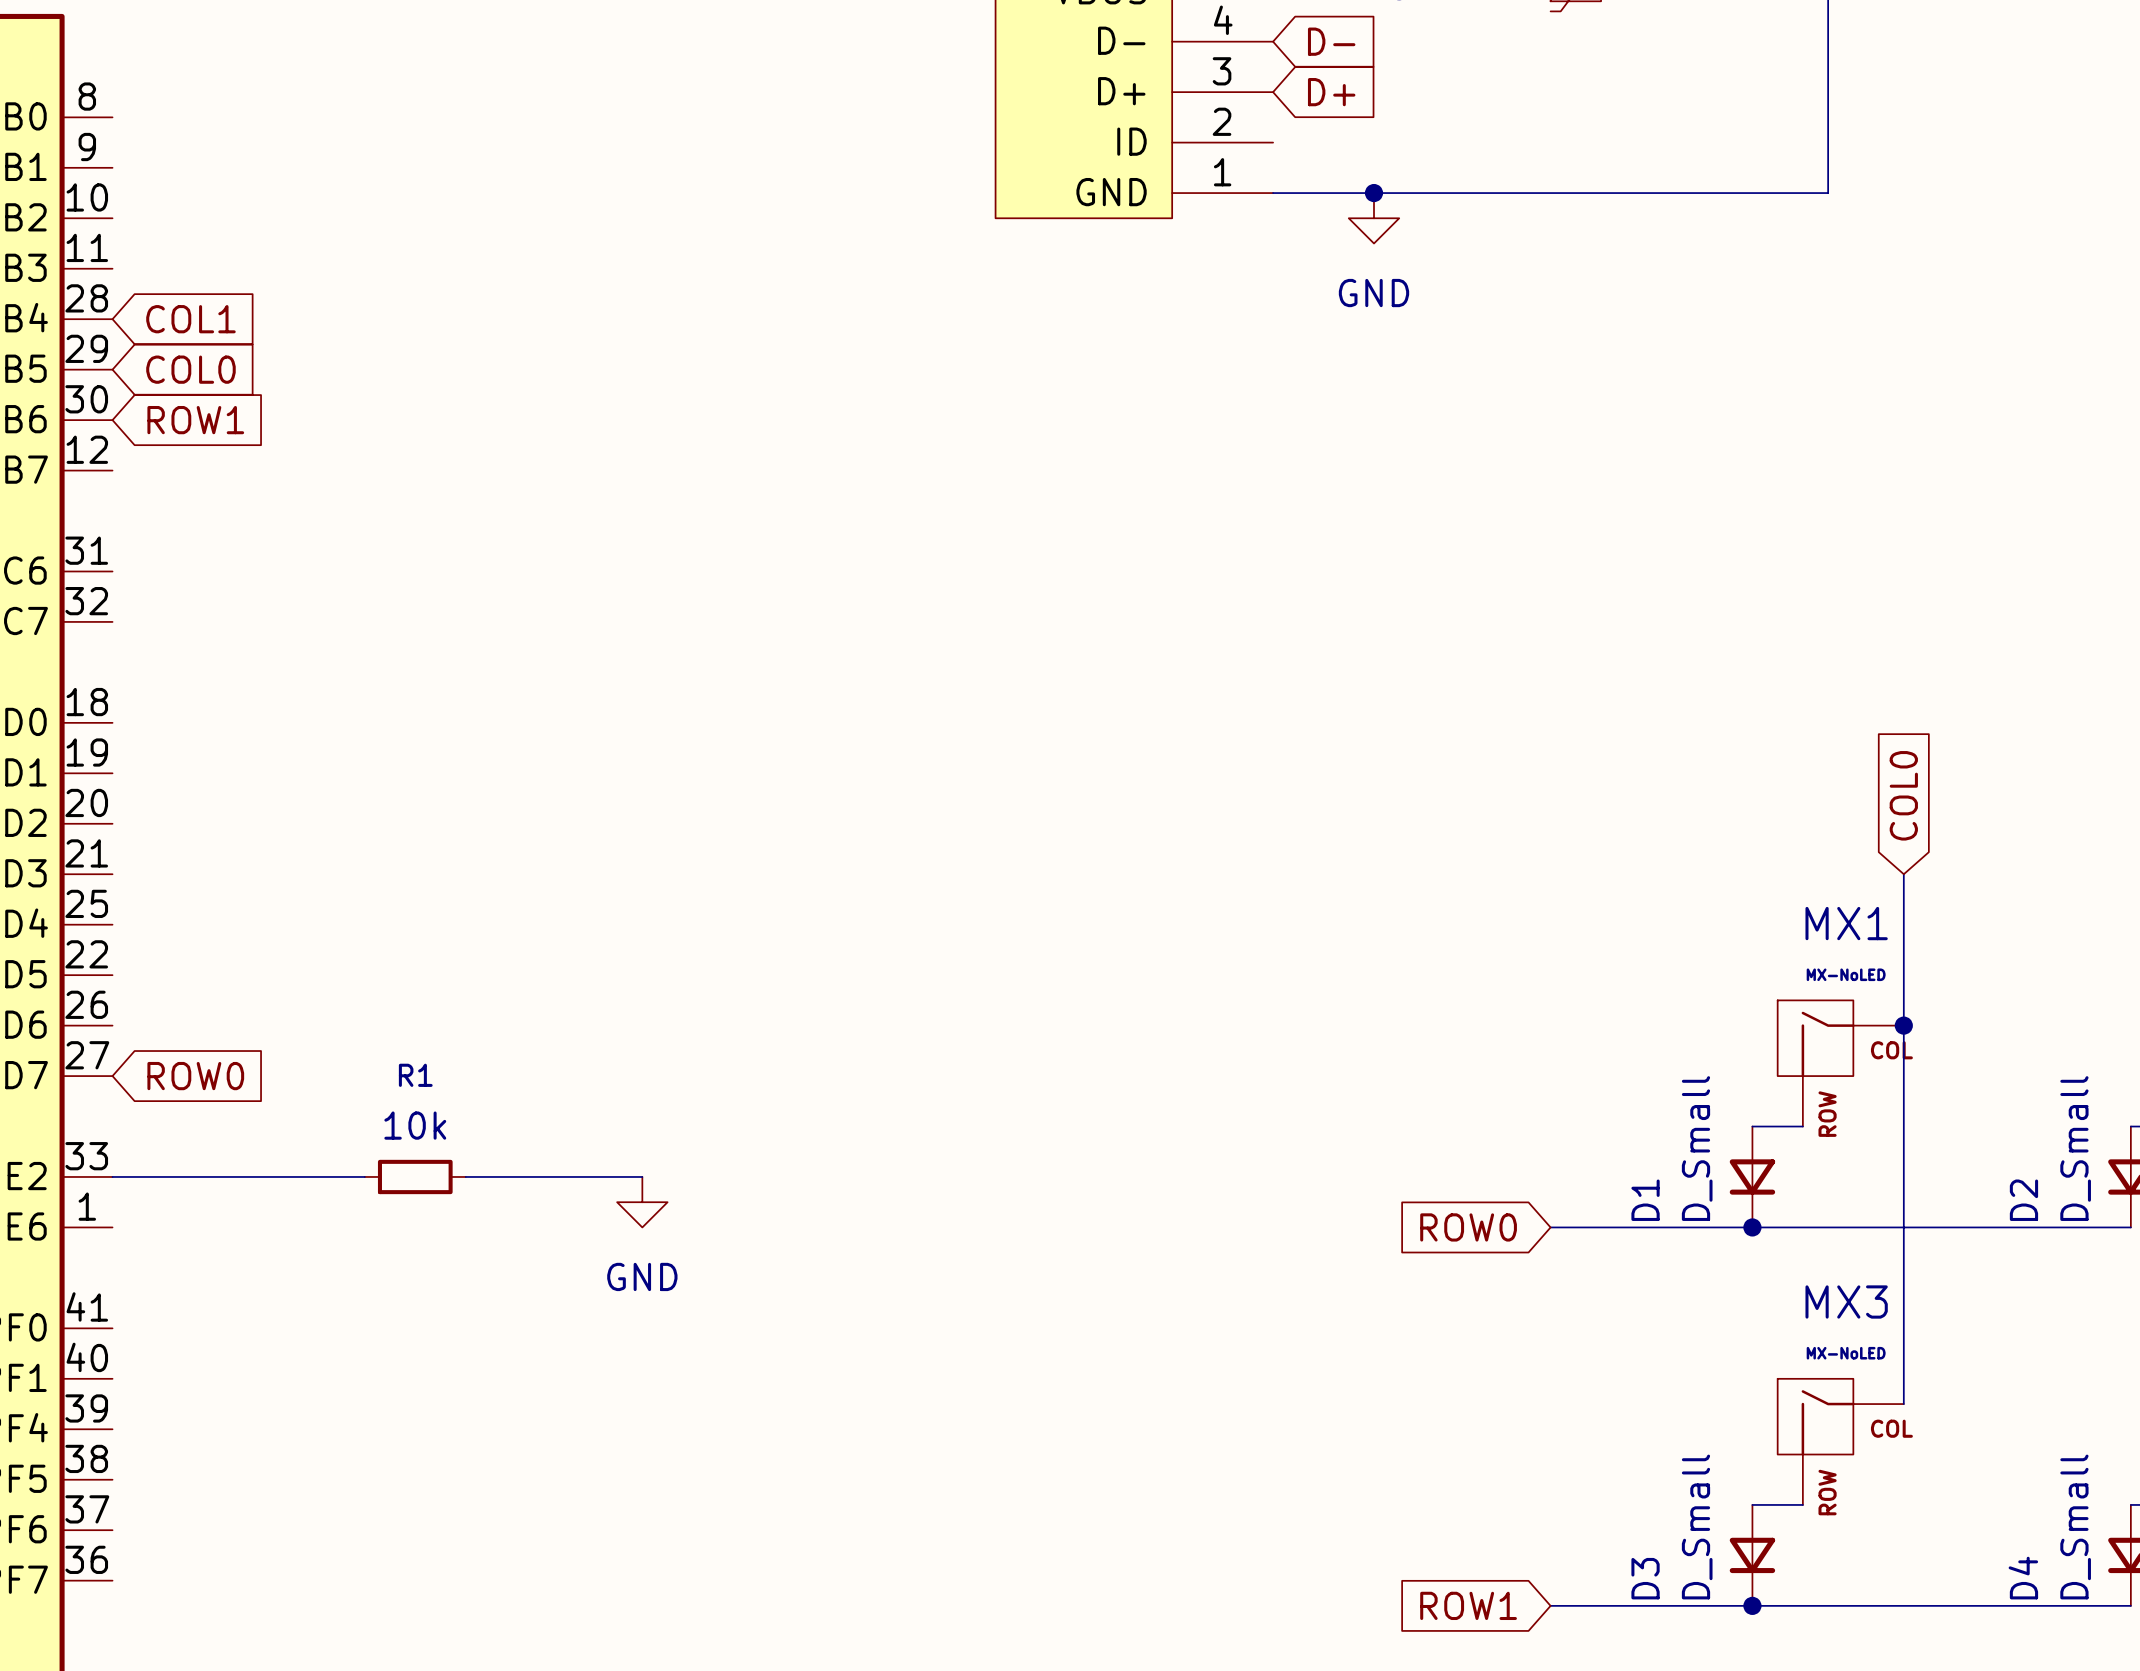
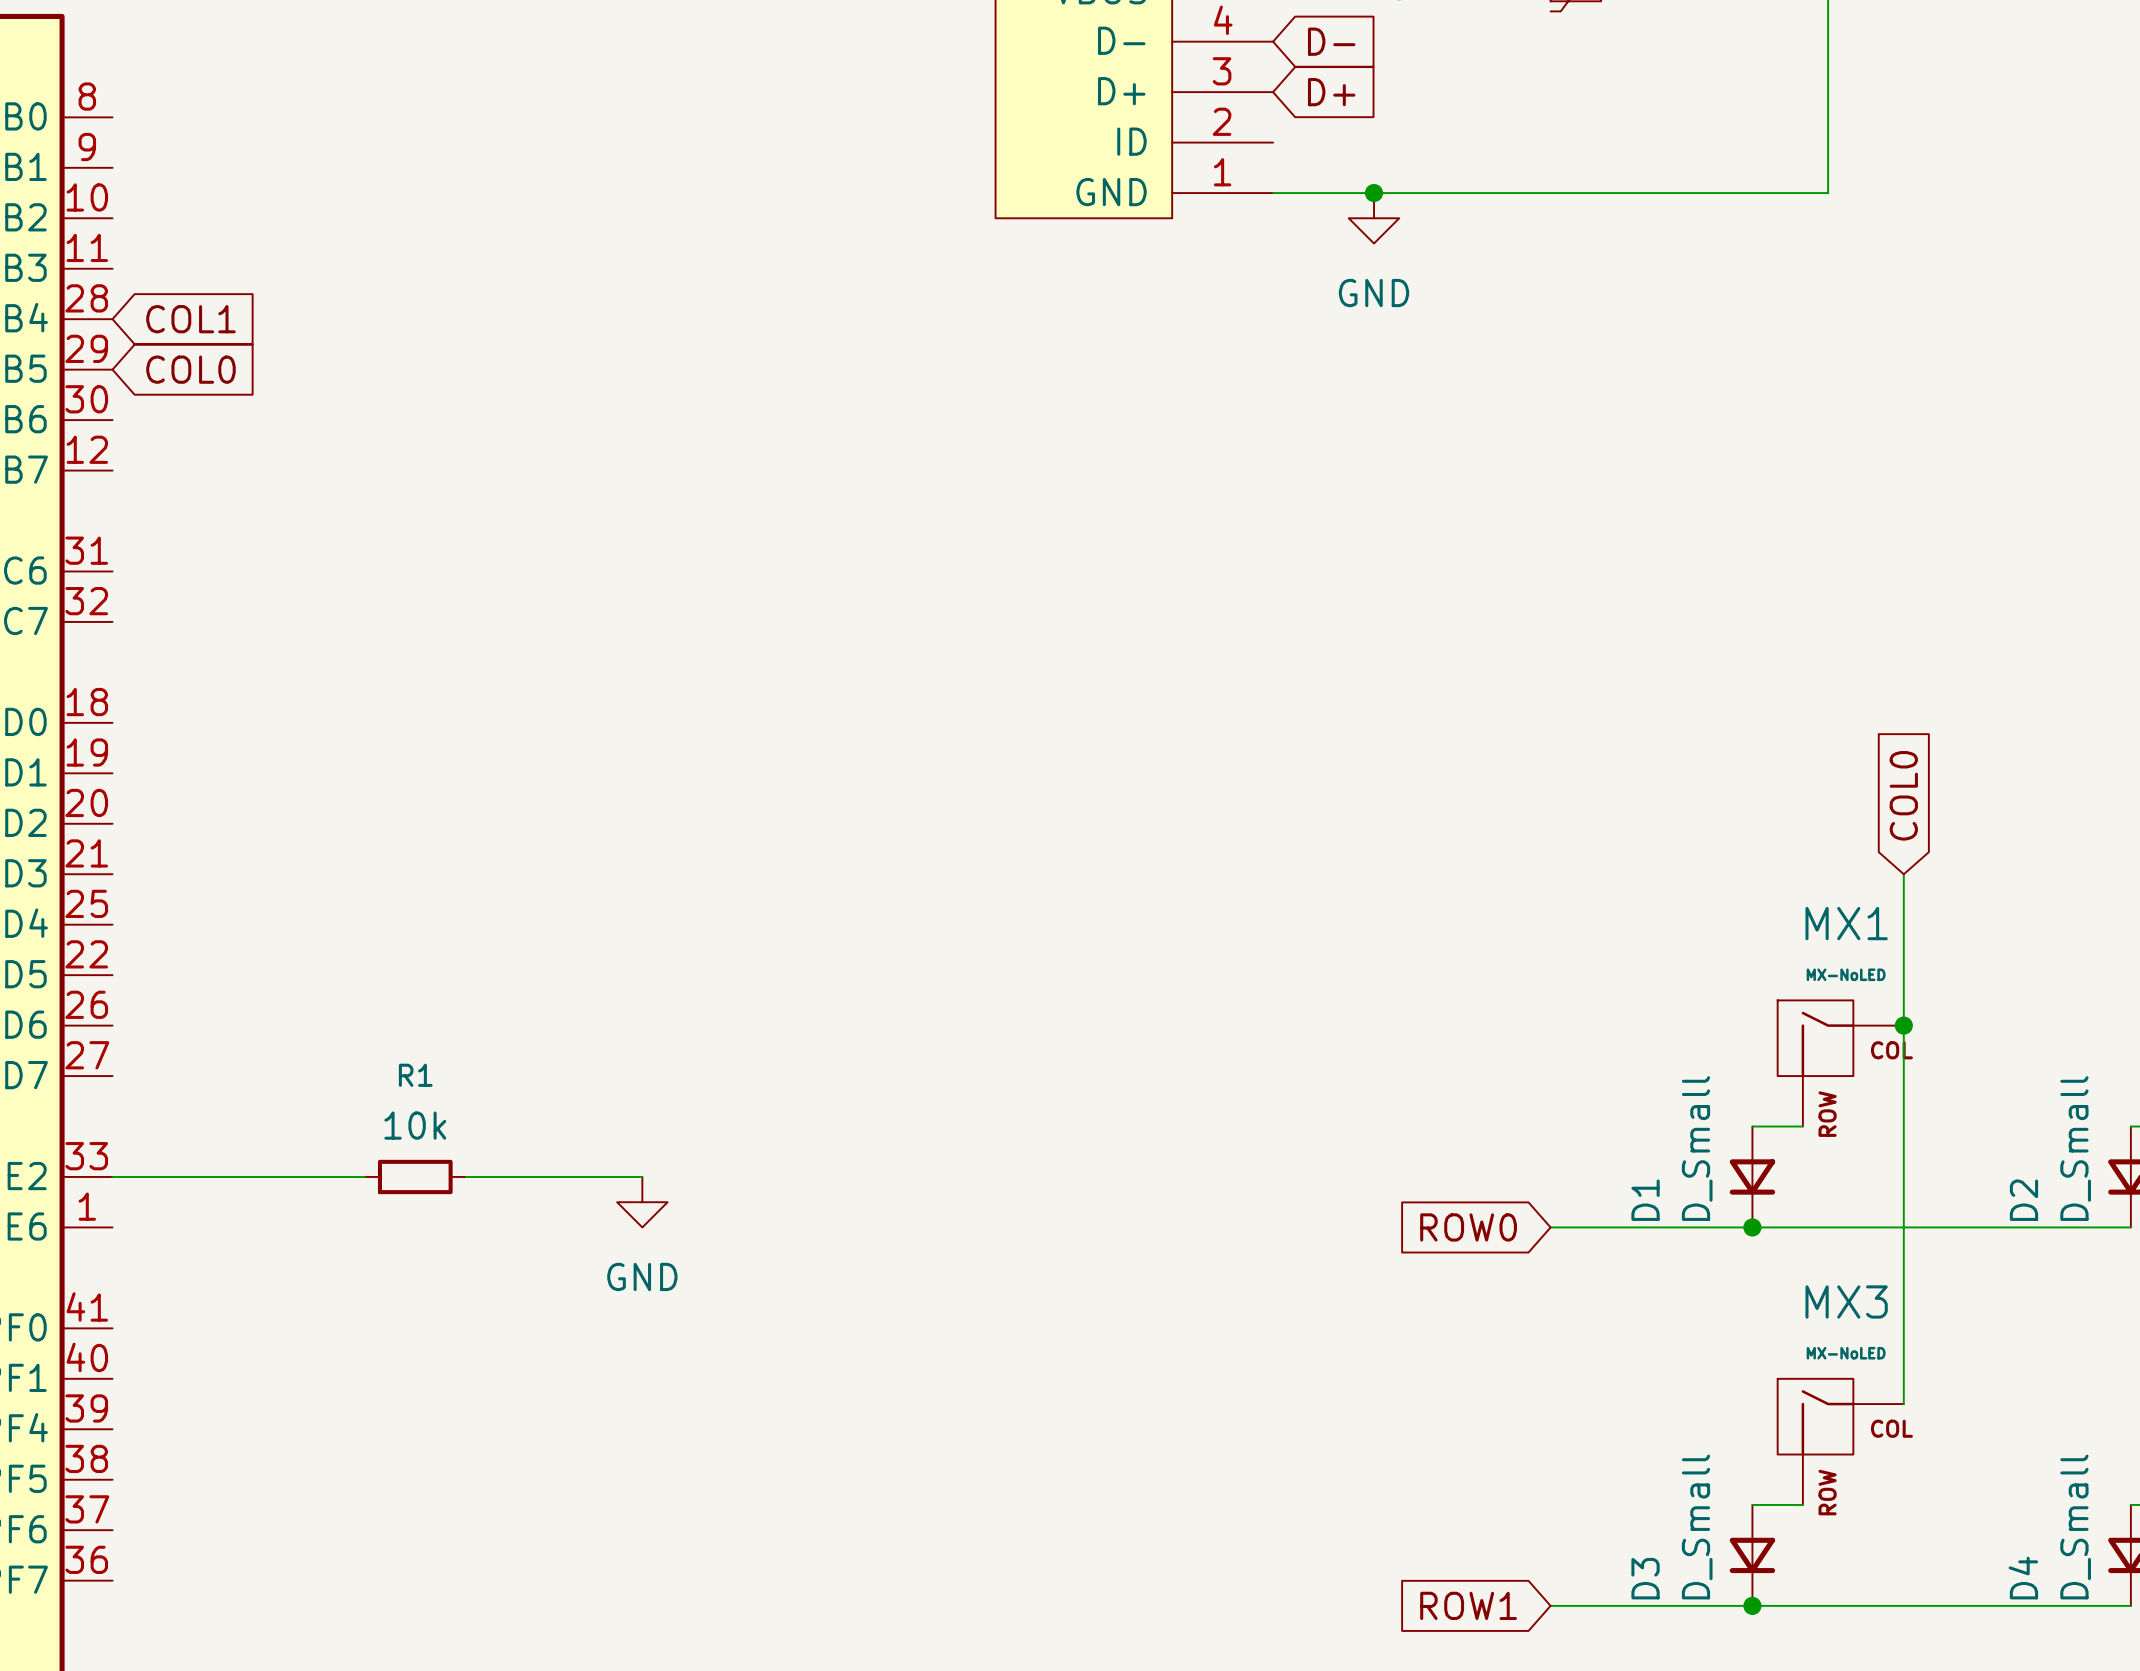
global label: ROW1 (195, 420) -> none
global label: ROW0 (195, 1076) -> none

